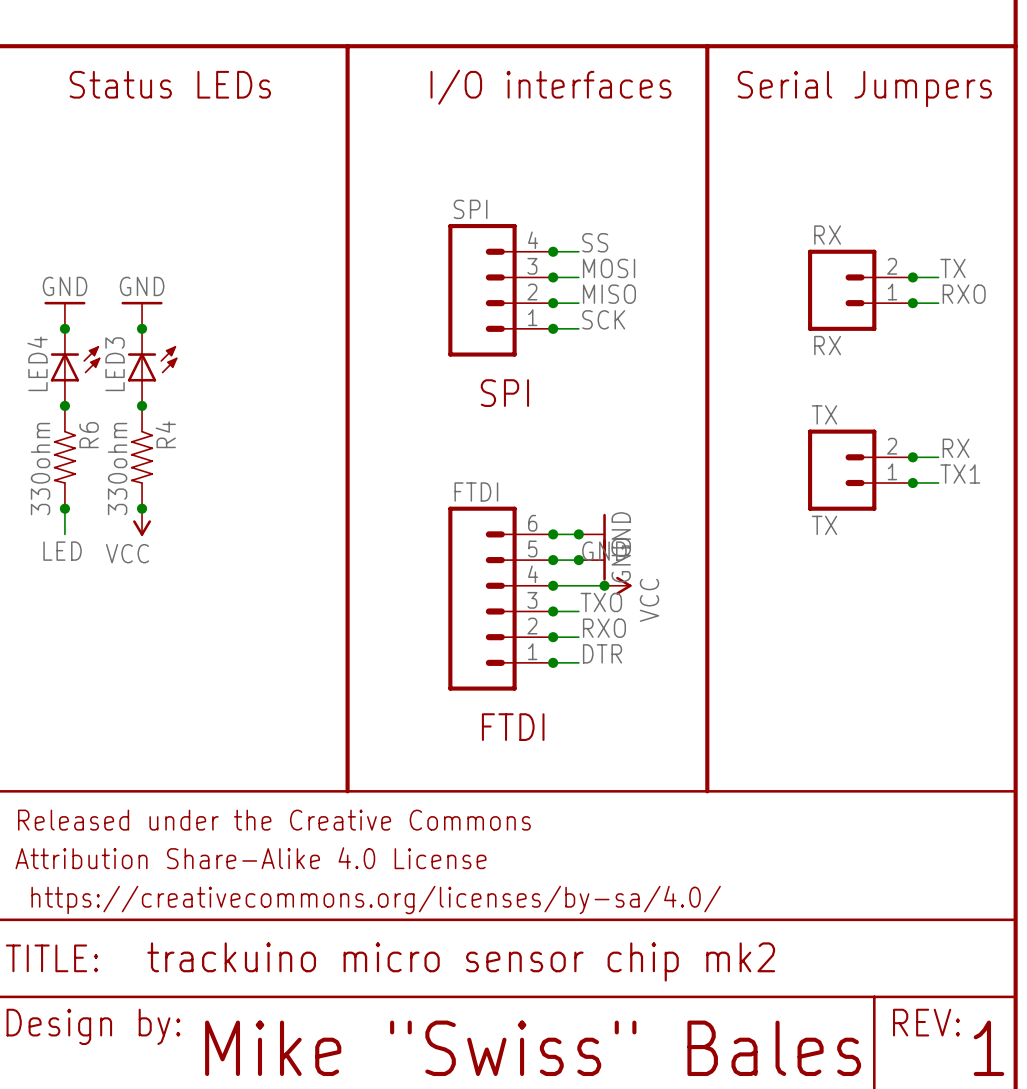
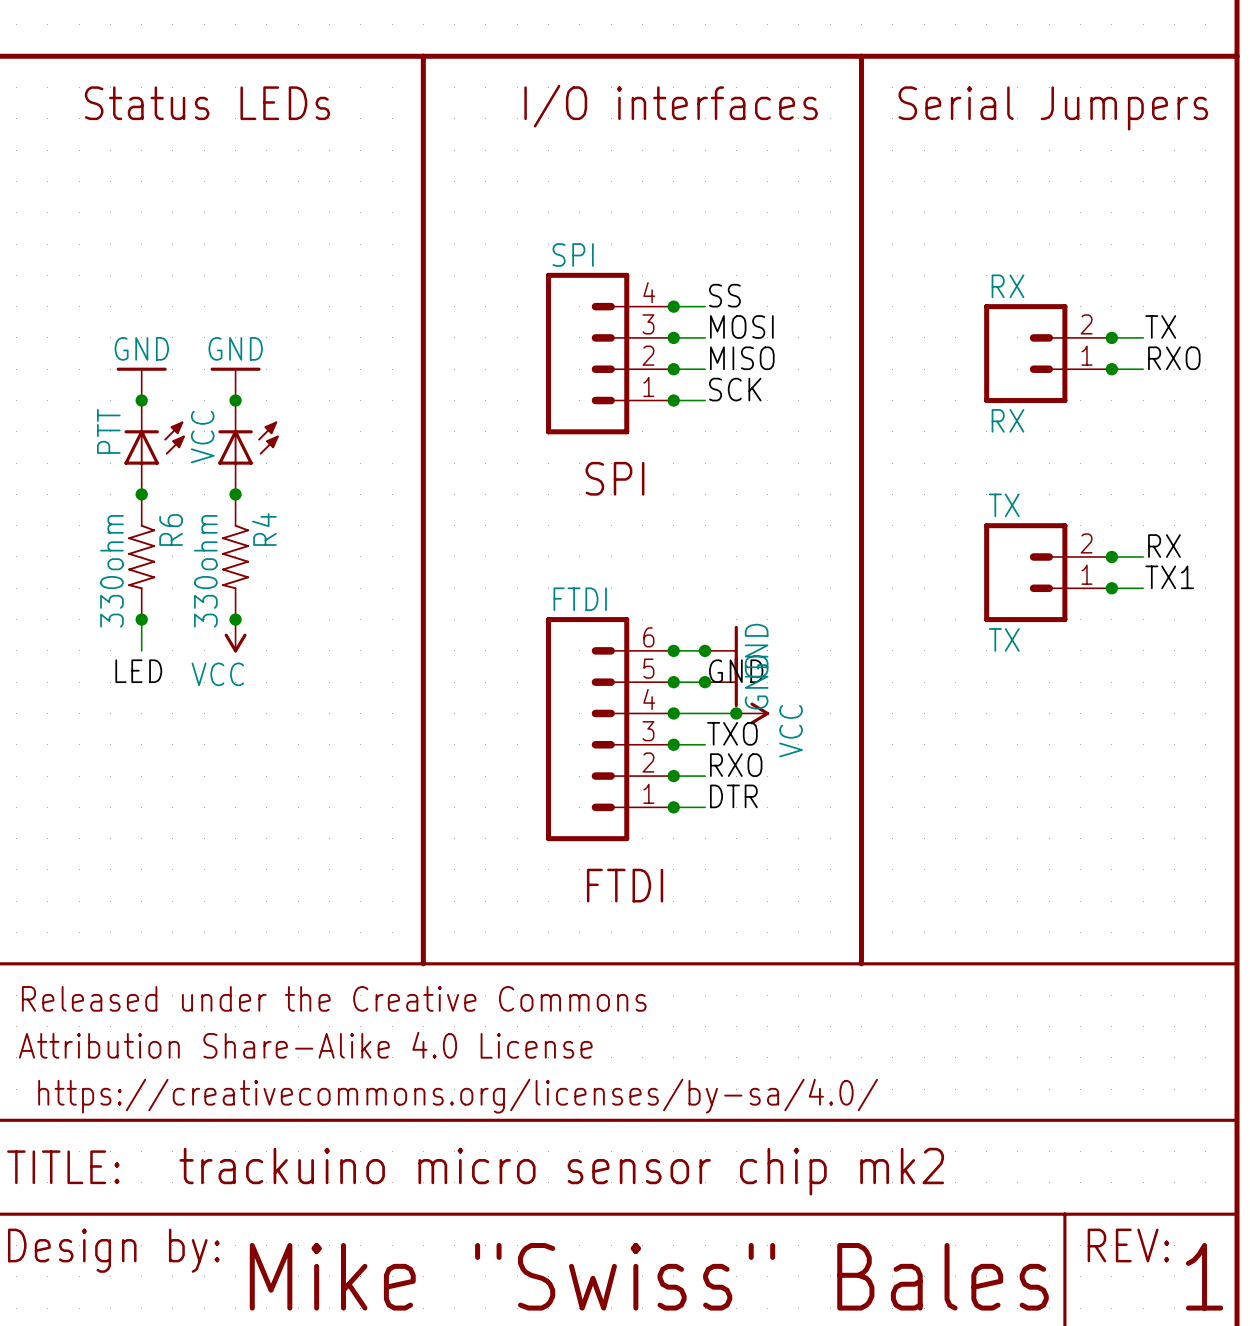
power symbol: GND (64, 315) -> none
power symbol: none -> GND (141, 384)
power symbol: GND (142, 315) -> none
power symbol: none -> GND (235, 384)
junction: (64, 328) -> none
junction: none -> (141, 400)
junction: (142, 328) -> none
junction: none -> (235, 400)
LED4: (75, 367) -> none
PTT: none -> (154, 447)
LED3: (152, 367) -> none
VCC: none -> (248, 447)
junction: (64, 405) -> none
junction: none -> (141, 494)
junction: (142, 405) -> none
junction: none -> (235, 494)
R6 position: (64, 457) -> (141, 556)
R4 position: (142, 457) -> (235, 556)
wire: (64, 508) (64, 534) -> (141, 619) (141, 650)
junction: (64, 508) -> none
junction: none -> (141, 619)
junction: (142, 508) -> none
junction: none -> (235, 619)
power symbol position: VCC (142, 522) -> VCC (235, 636)
label position: LED (62, 551) -> LED (138, 671)

